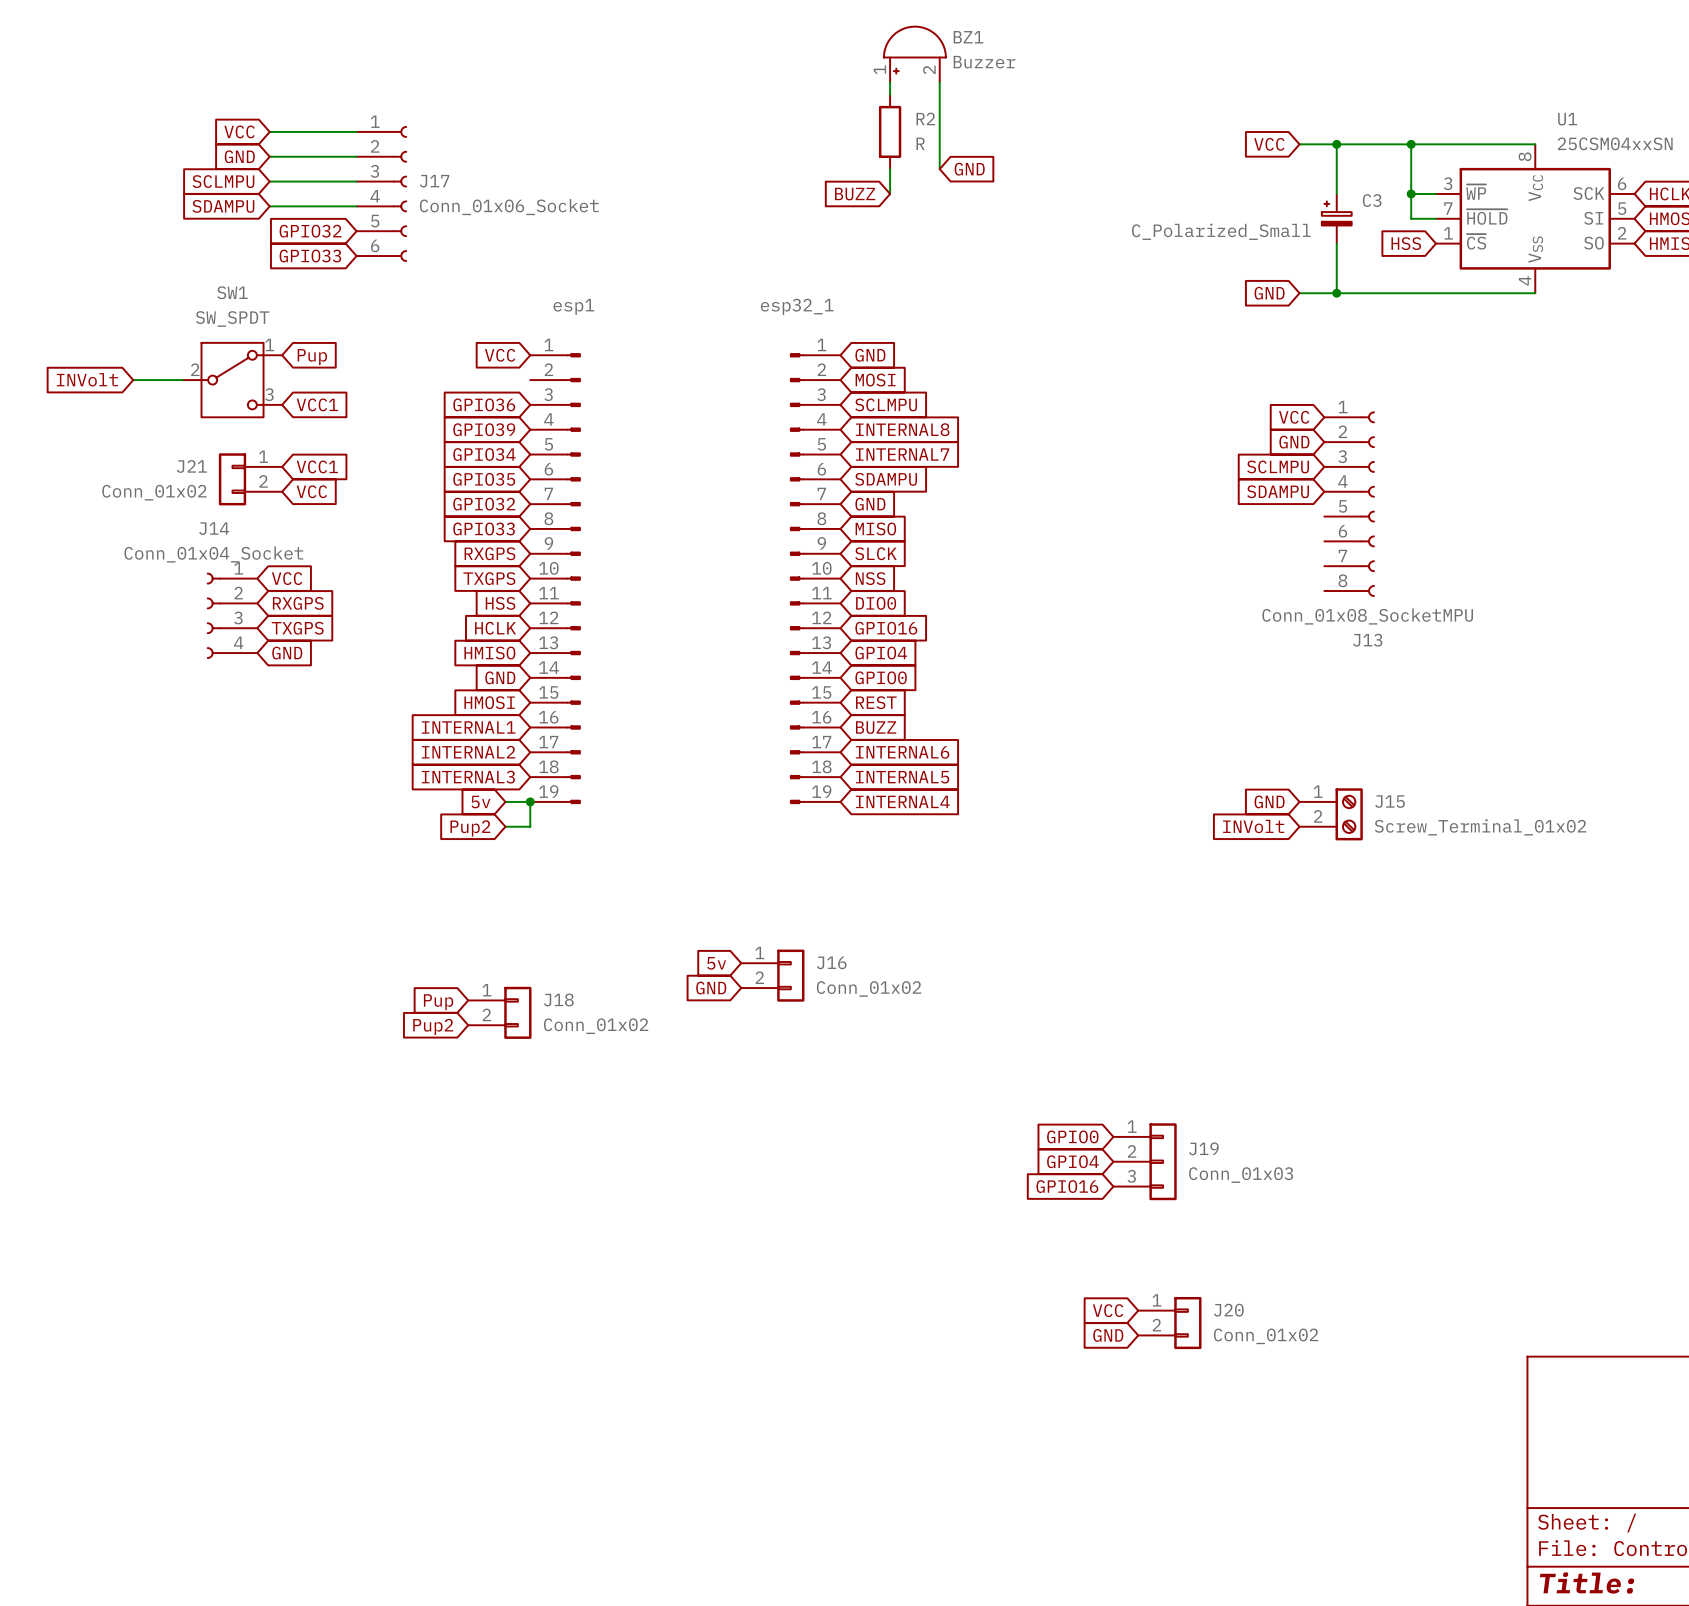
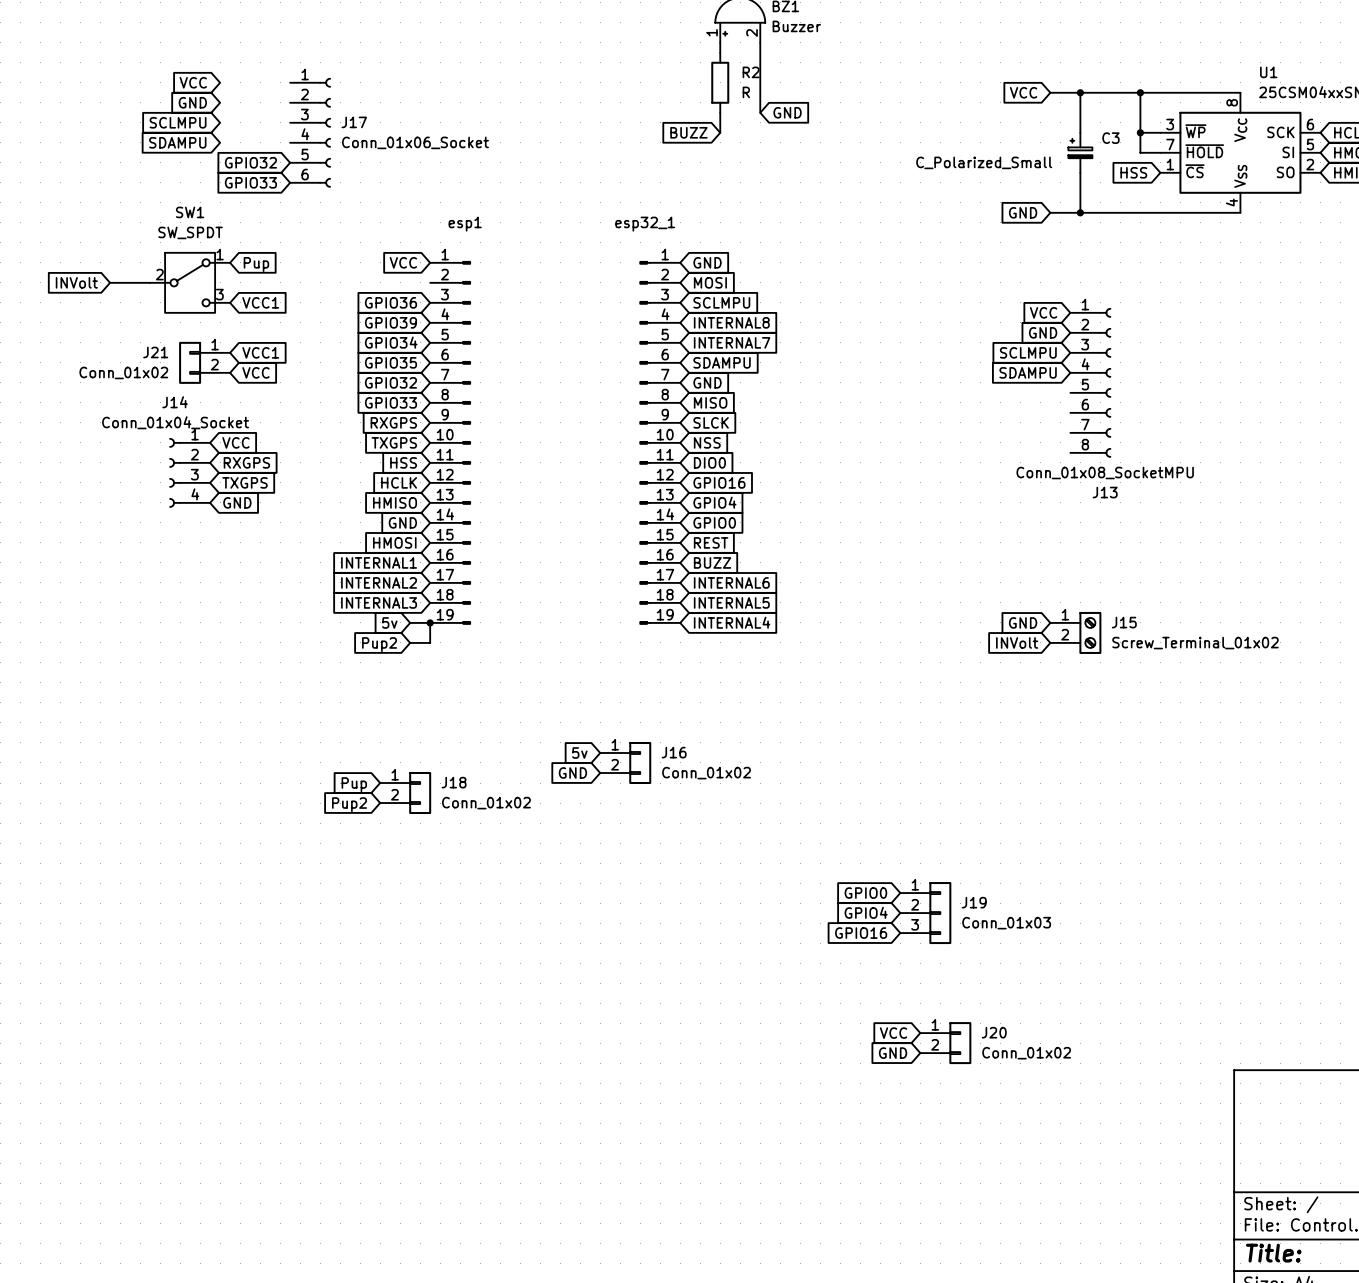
wire: (269, 131) (356, 131) -> none
wire: (269, 156) (356, 156) -> none
wire: (269, 181) (356, 181) -> none
wire: (269, 206) (356, 206) -> none

